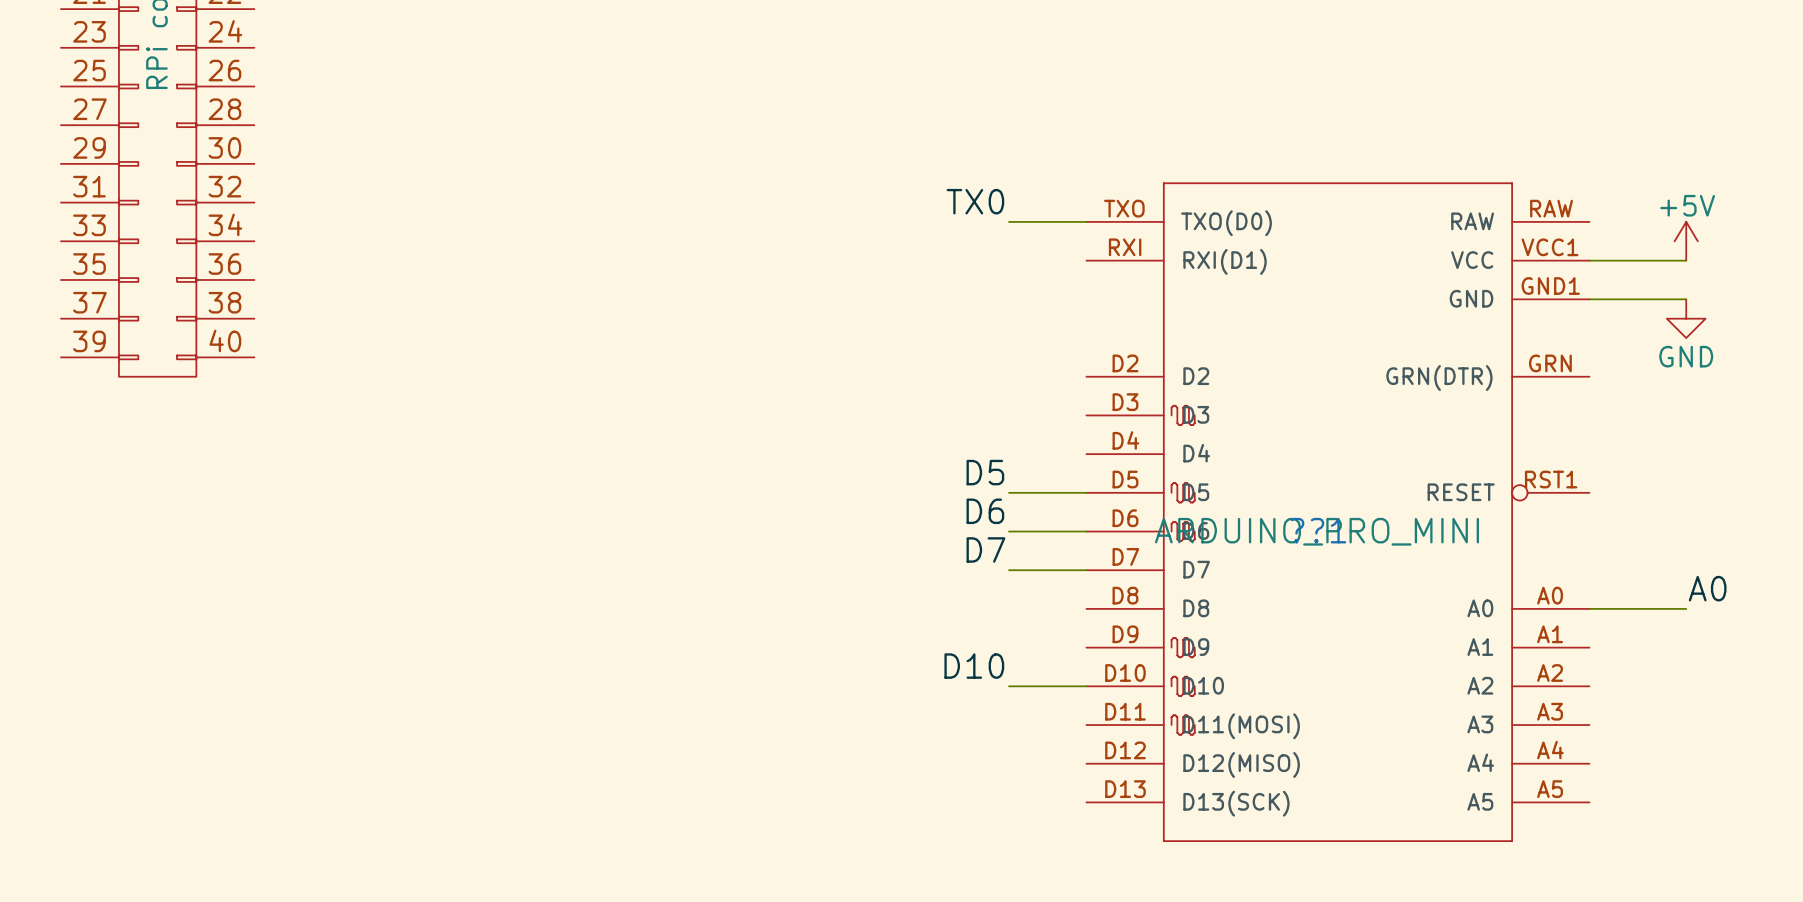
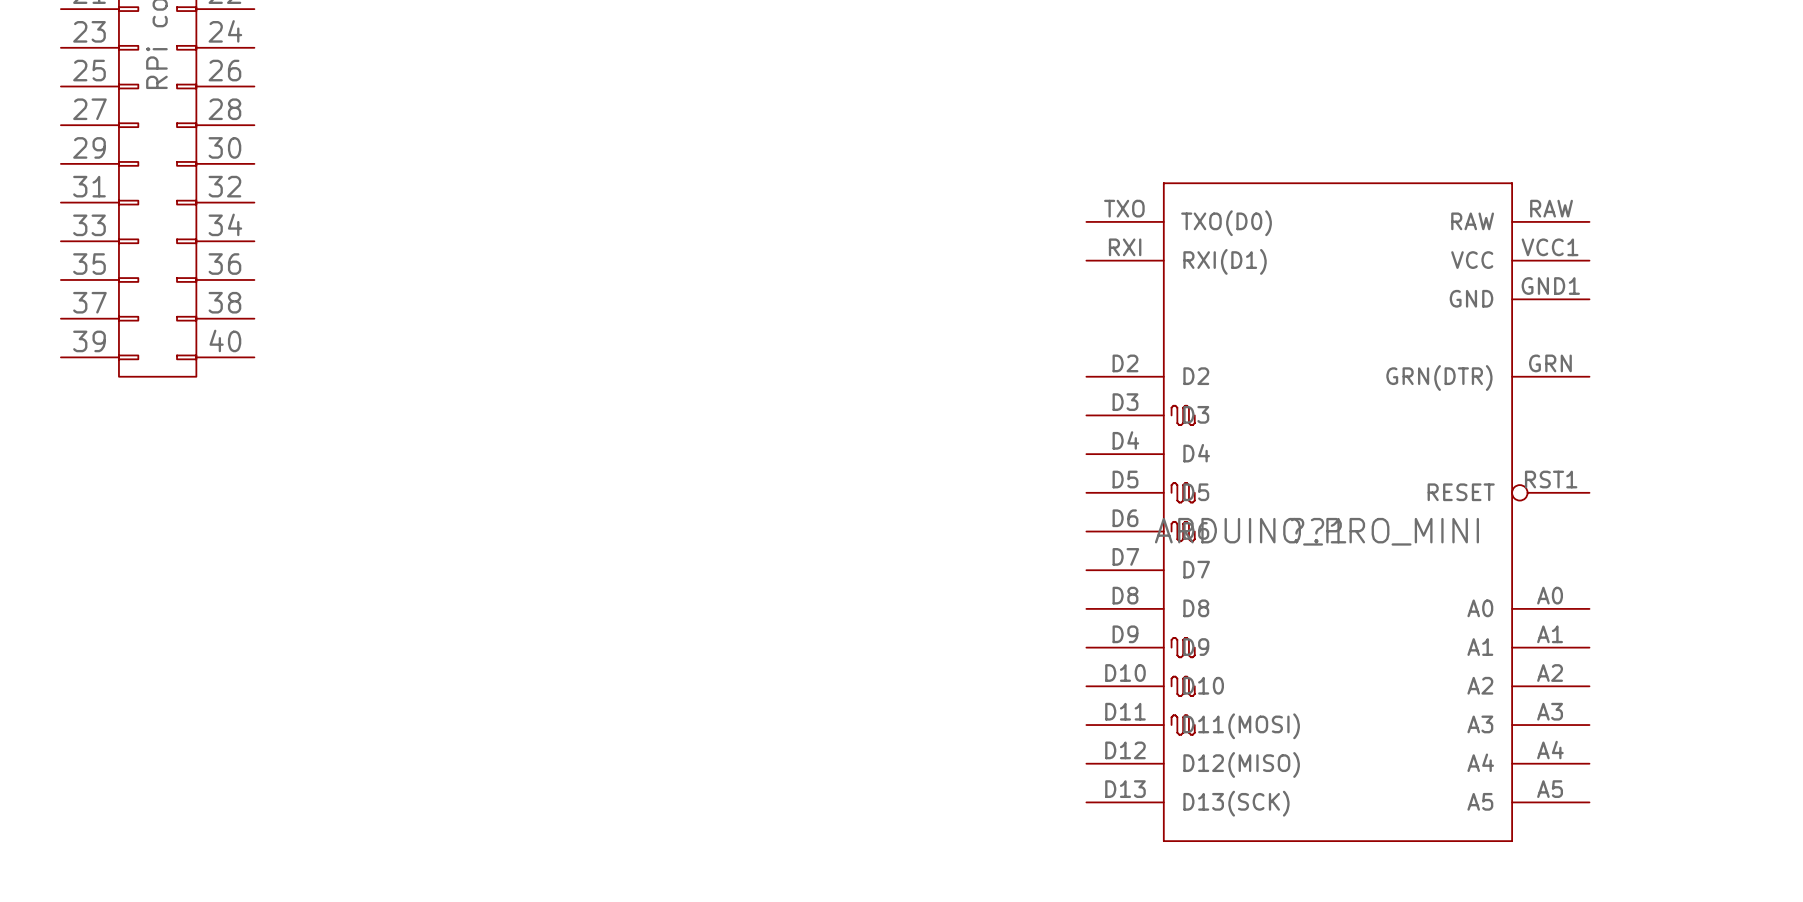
label: TX0 (975, 201) -> none
wire: (1009, 221) (1086, 221) -> none
power symbol: +5V (1686, 241) -> none
wire: (1589, 260) (1686, 260) -> none
wire: (1589, 299) (1686, 299) -> none
power symbol: GND (1686, 318) -> none
label: D5 (985, 472) -> none
wire: (1009, 492) (1086, 492) -> none
label: D6 (985, 511) -> none
wire: (1009, 531) (1086, 531) -> none
label: D7 (985, 549) -> none
wire: (1009, 570) (1086, 570) -> none
label: A0 (1707, 588) -> none
wire: (1589, 608) (1686, 608) -> none
label: D10 (974, 666) -> none
wire: (1009, 686) (1086, 686) -> none

